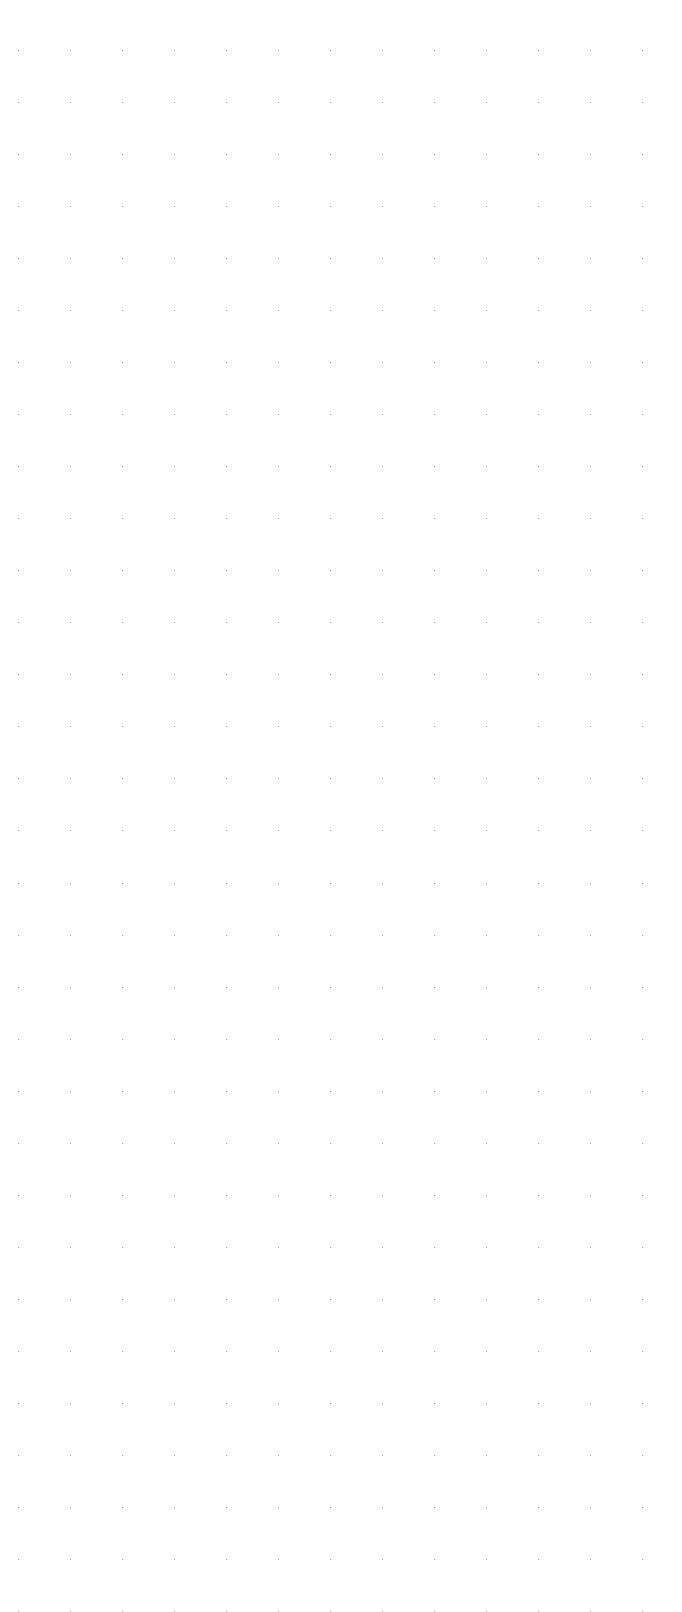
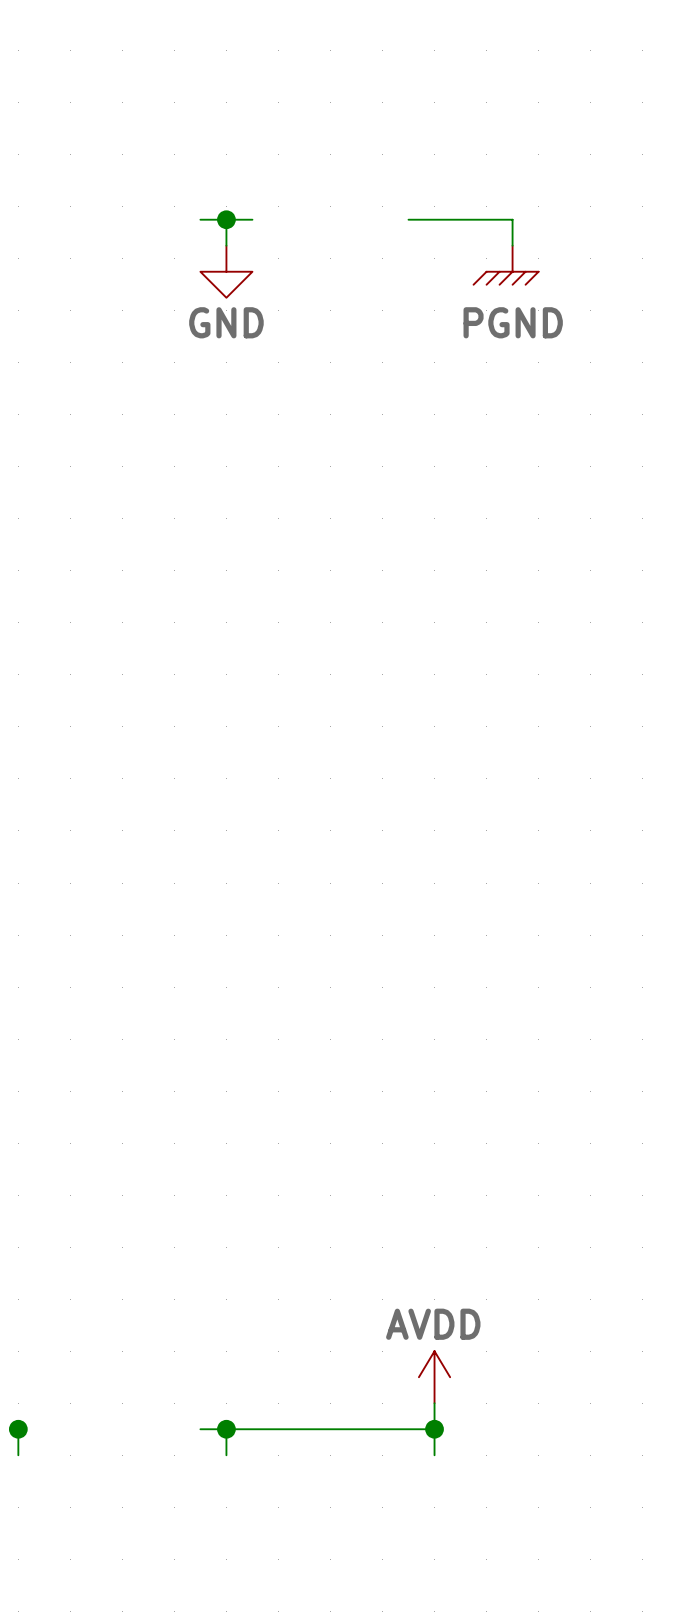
wire: none -> (200, 219) (252, 219)
wire: none -> (226, 219) (226, 245)
junction: none -> (226, 219)
wire: none -> (408, 219) (512, 219) (512, 245)
power symbol: none -> PGND (506, 265)
power symbol: none -> GND (226, 271)
power symbol: none -> AVDD (434, 1377)
wire: none -> (434, 1403) (434, 1455)
wire: none -> (18, 1429) (18, 1455)
junction: none -> (18, 1429)
wire: none -> (200, 1429) (434, 1429)
wire: none -> (226, 1429) (226, 1455)
junction: none -> (226, 1429)
junction: none -> (434, 1429)

